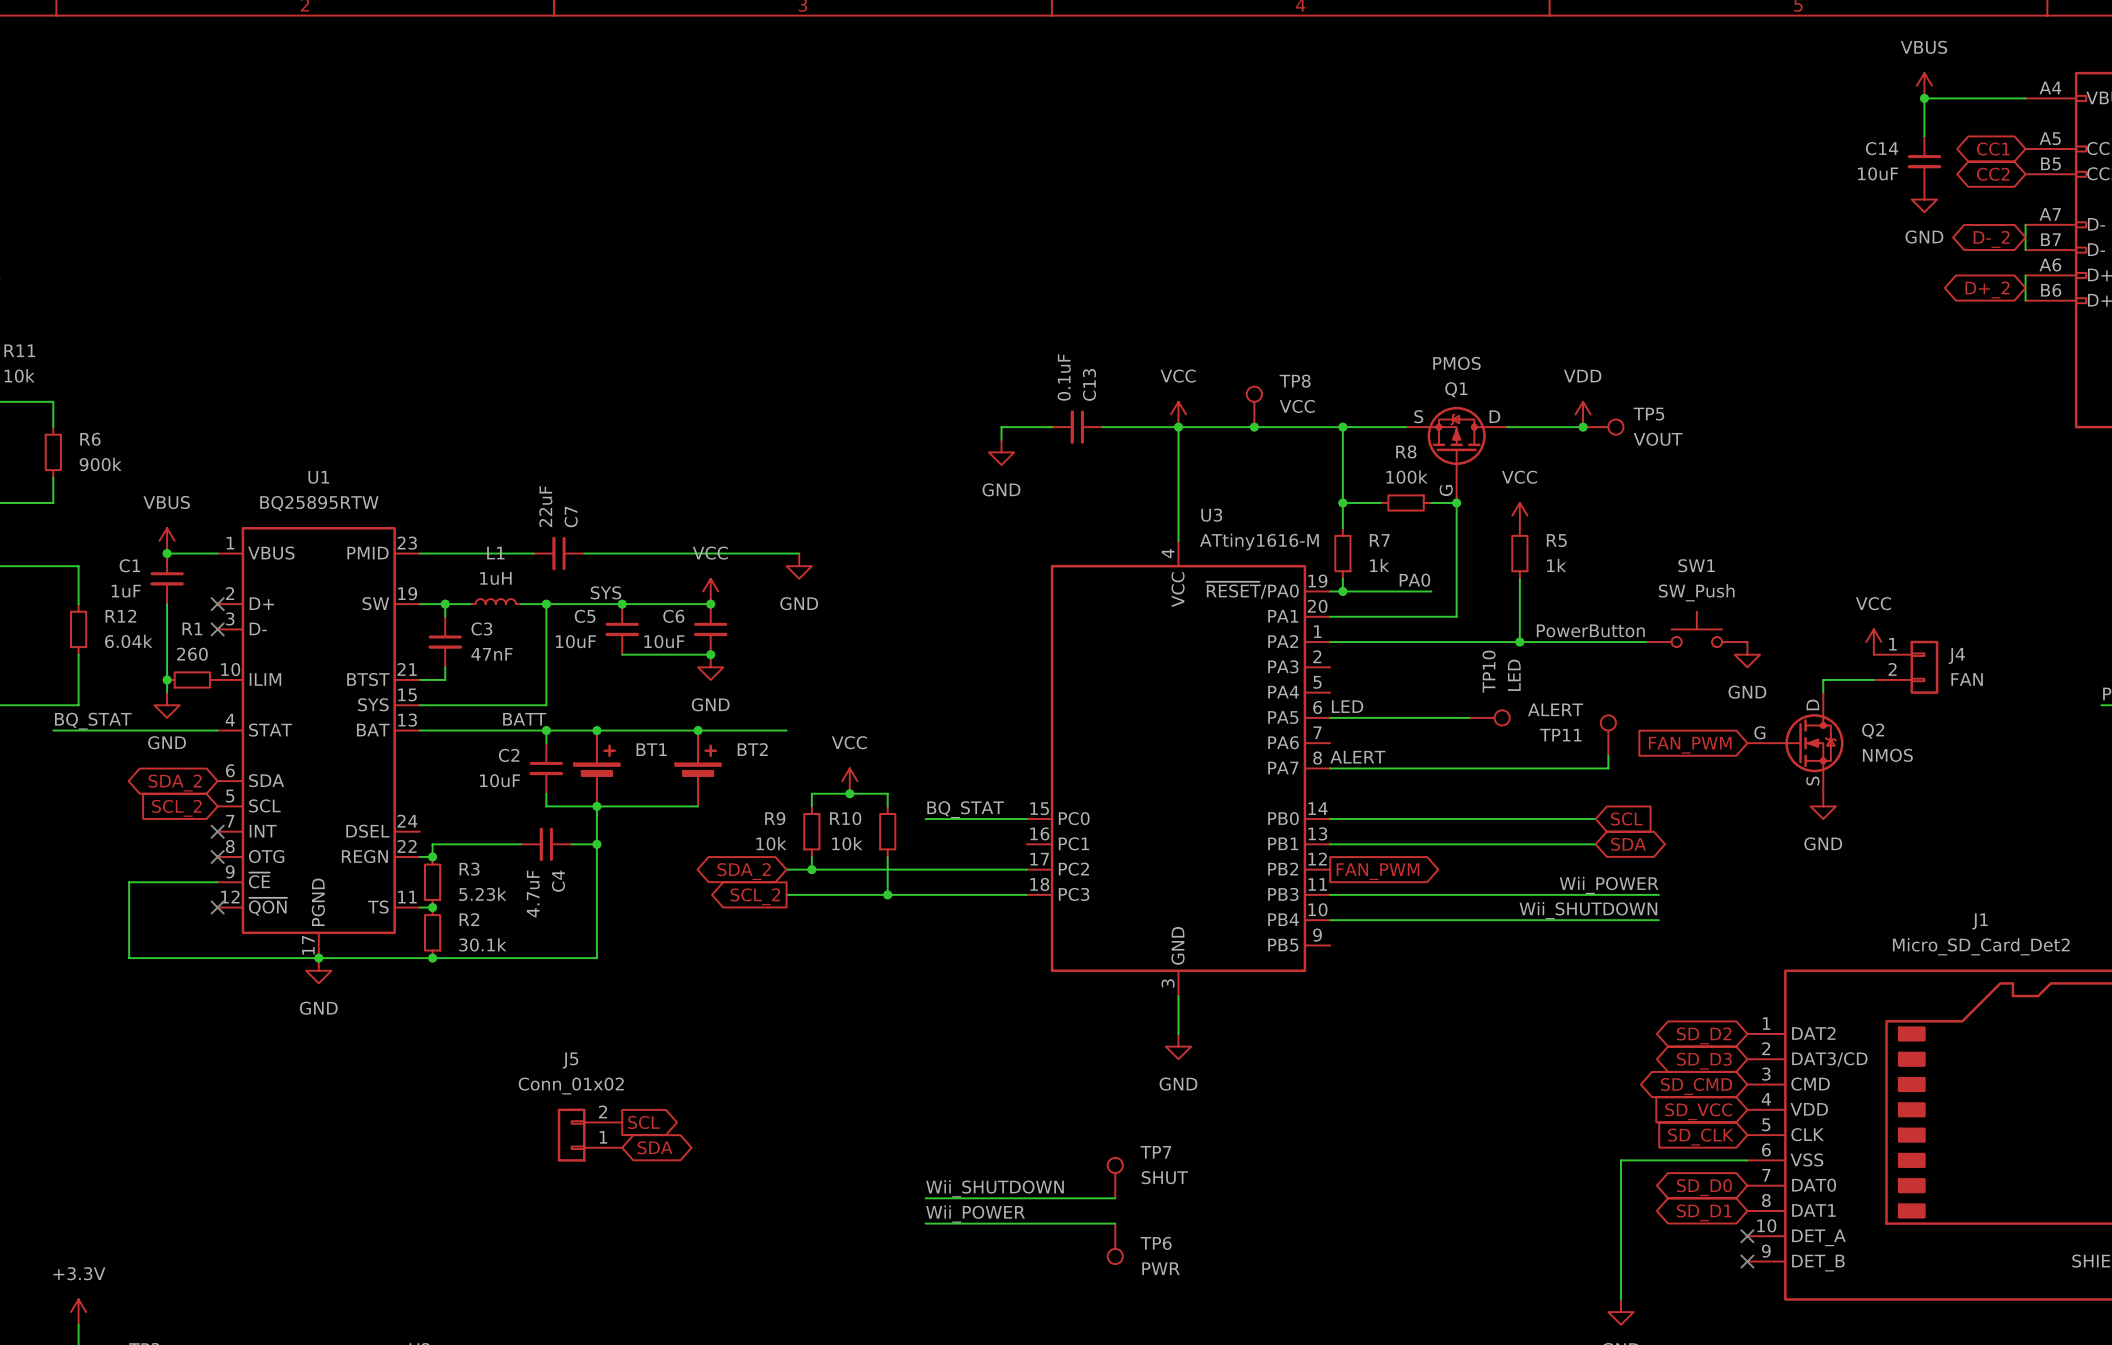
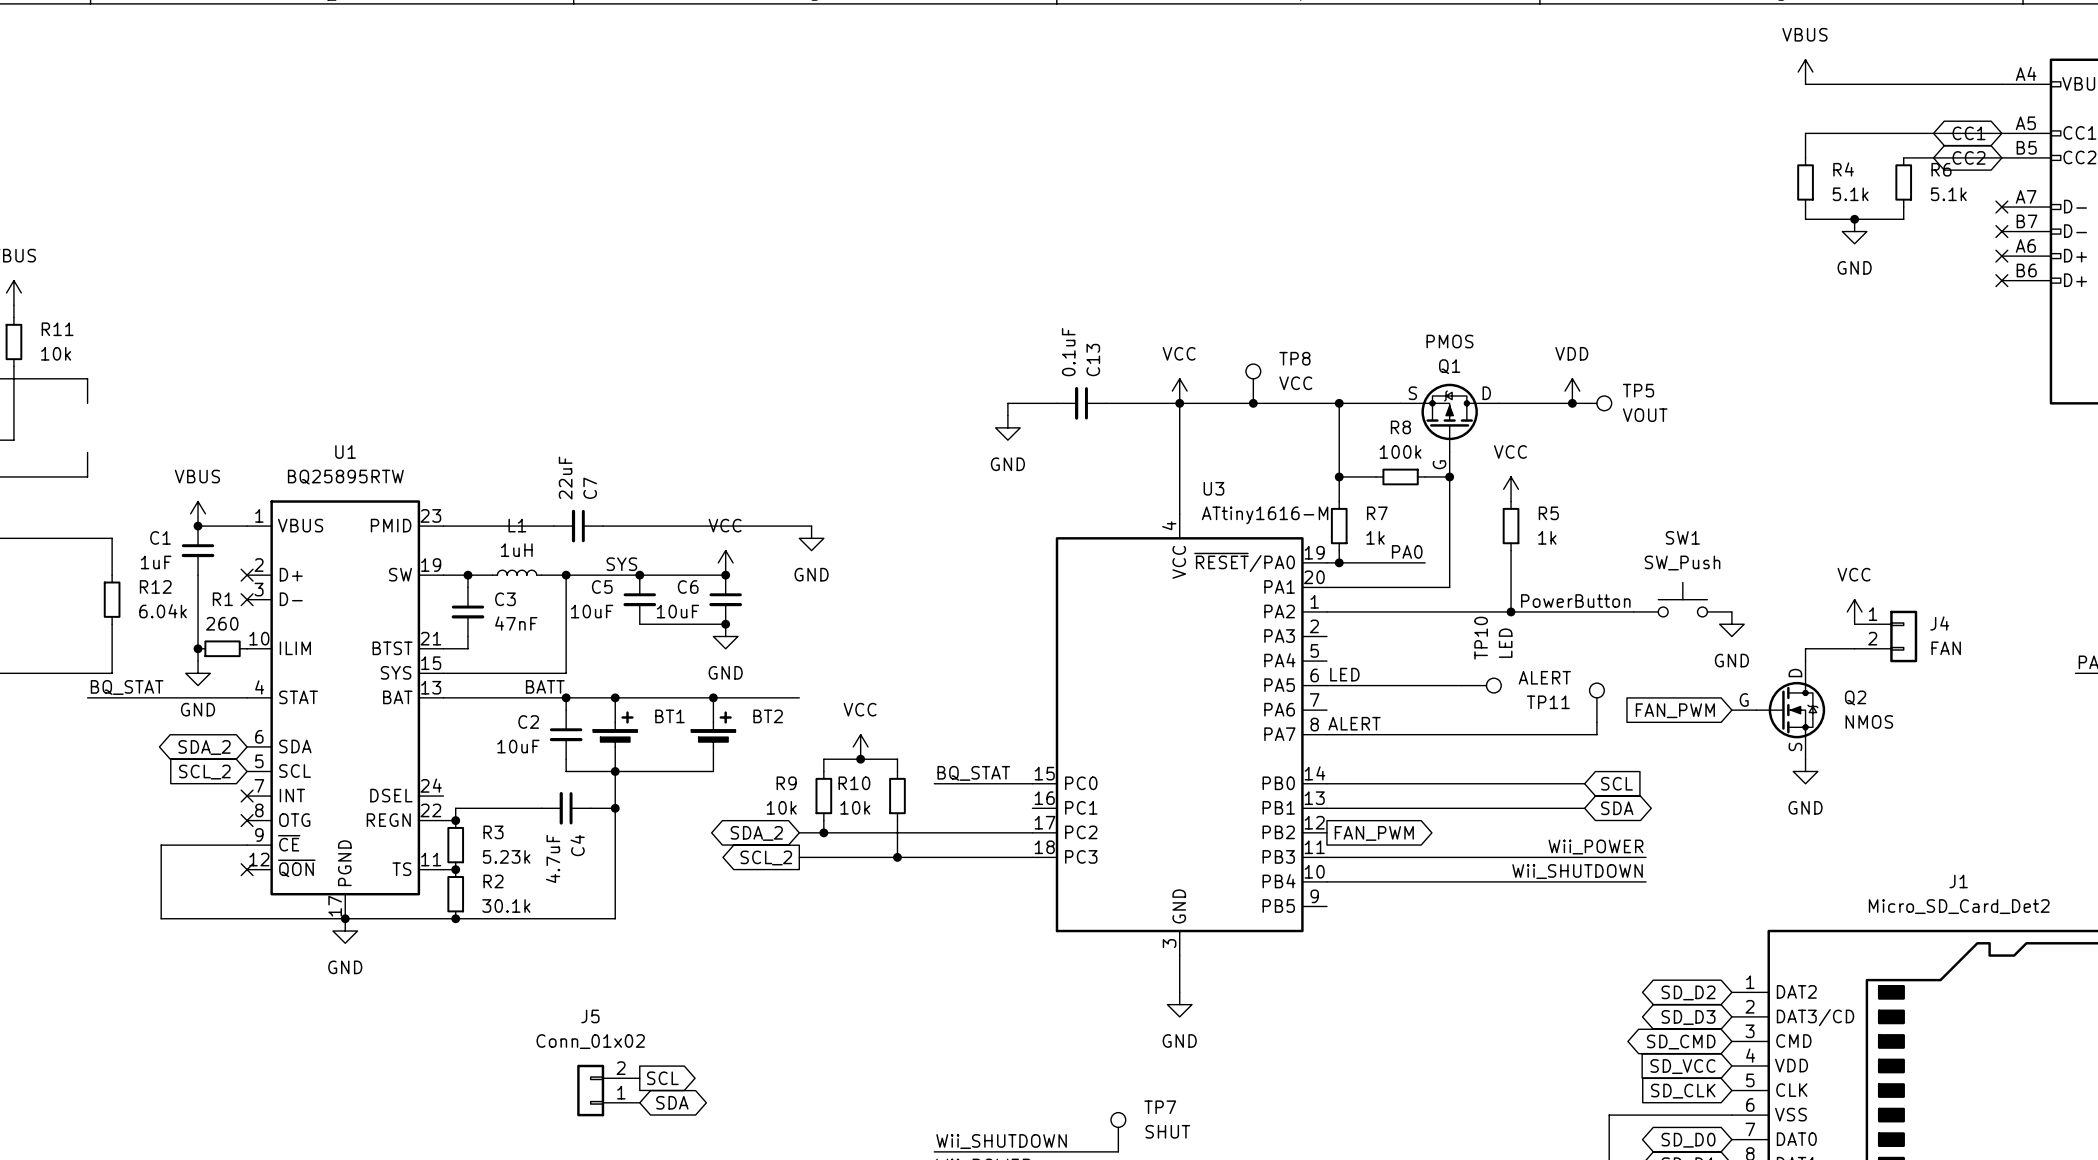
power symbol position: VBUS (1924, 85) -> VBUS (1805, 72)
wire: (1924, 98) (1924, 136) -> (1903, 84) (1805, 84)
junction: (1924, 98) -> none
wire: none -> (2001, 133) (1805, 133) (1805, 157)
C14: 10uF (1924, 161) -> none
wire: none -> (1903, 157) (2001, 157)
R4: none -> 5.1k (1805, 182)
power symbol position: GND (1924, 199) -> GND (1854, 231)
wire: none -> (1805, 207) (1805, 219) (1903, 219) (1903, 207)
wire: (2025, 224) (2025, 250) -> none
no-connect mark: none -> (2001, 207)
junction: none -> (1854, 219)
global label: D-_2 (1991, 239) -> none
no-connect mark: none -> (2001, 231)
wire: (2025, 275) (2025, 300) -> none
no-connect mark: none -> (2001, 256)
global label: D+_2 (1987, 289) -> none
no-connect mark: none -> (2001, 280)
R6 position: (53, 452) -> (1903, 182)
R6 value: 900k (100, 464) -> 5.1k (1948, 194)

